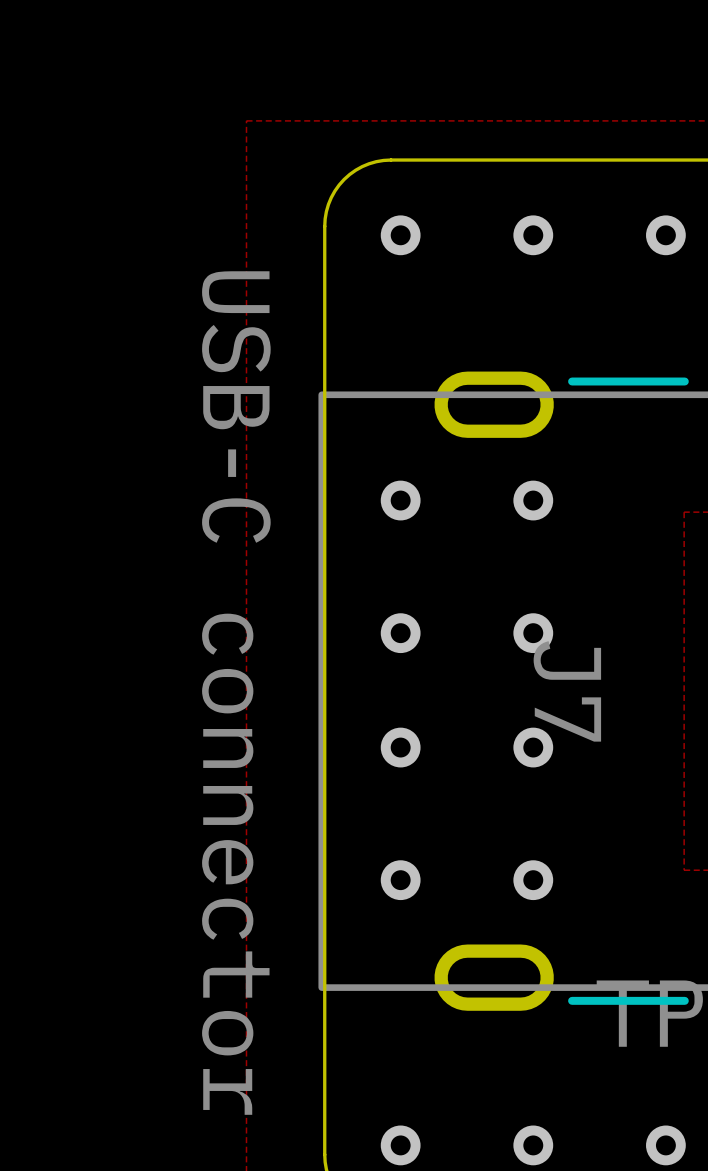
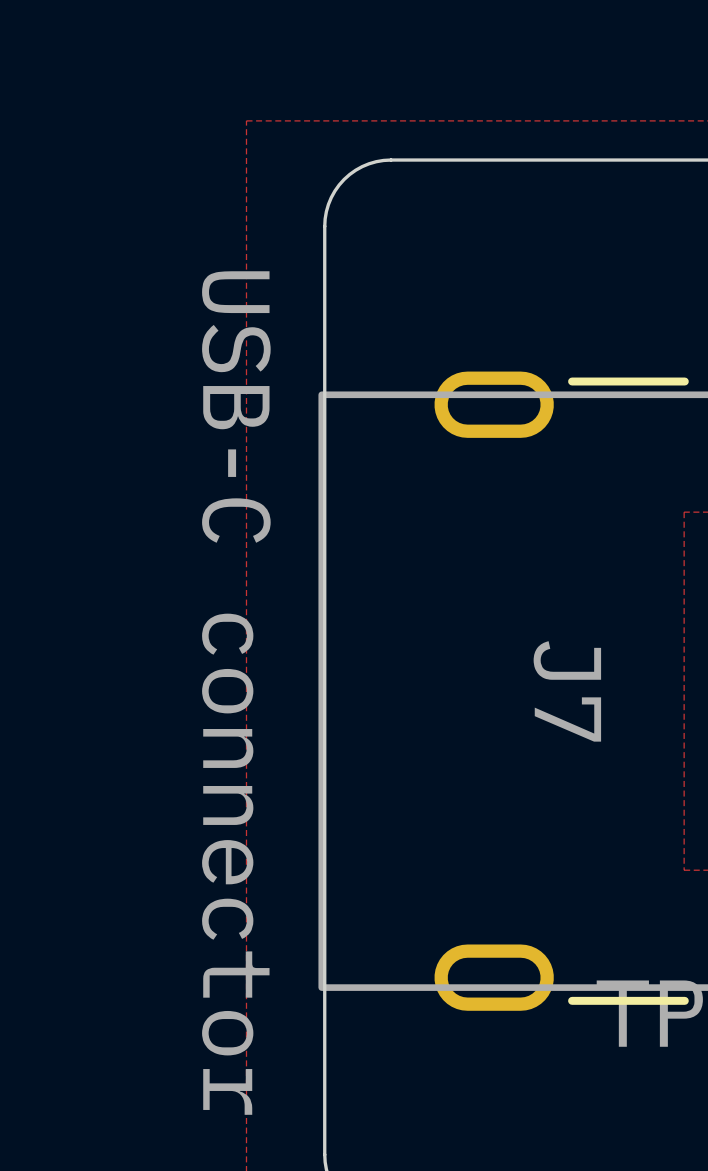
via: (400, 235) -> none
via: (533, 235) -> none
via: (665, 235) -> none
via: (400, 500) -> none
via: (533, 500) -> none
via: (400, 633) -> none
via: (533, 633) -> none
via: (400, 747) -> none
via: (533, 747) -> none
via: (400, 880) -> none
via: (533, 880) -> none
via: (400, 1145) -> none
via: (533, 1145) -> none
via: (665, 1145) -> none

